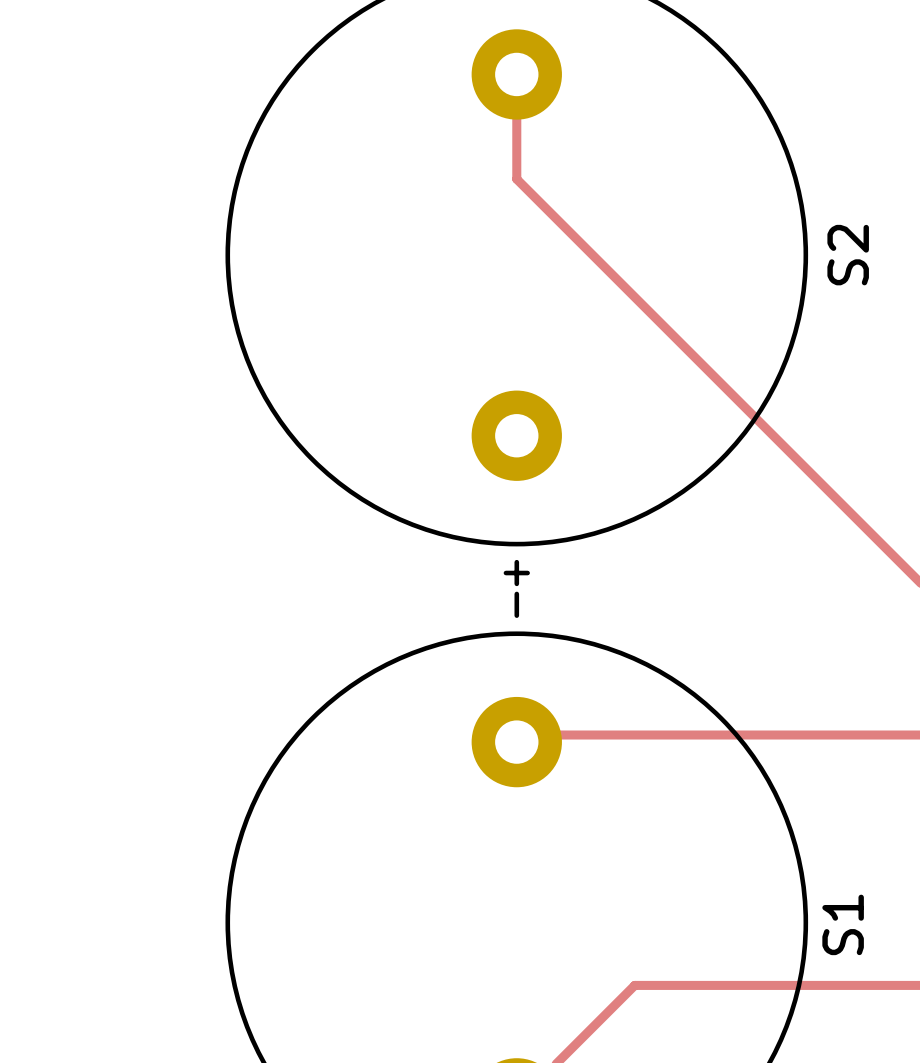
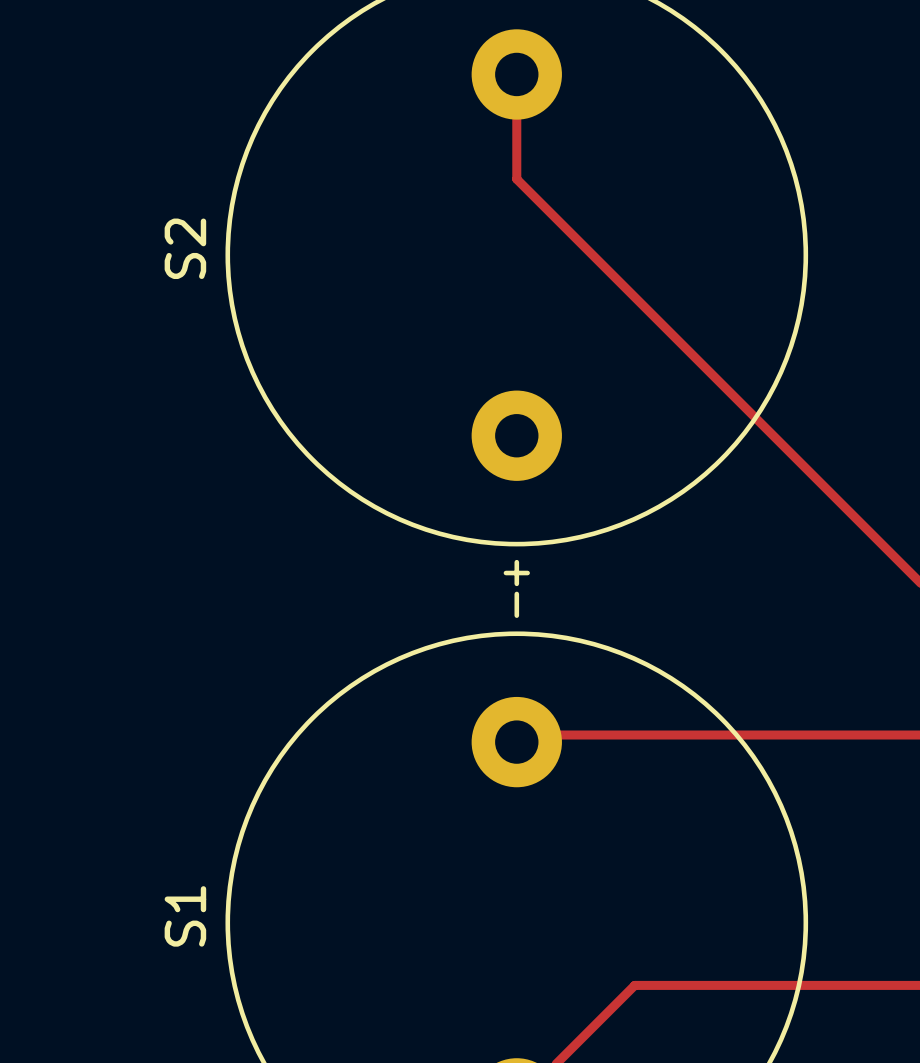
S2 name position: S2 (848, 255) -> S2 (185, 248)
S1 name position: S1 (843, 924) -> S1 (185, 916)

